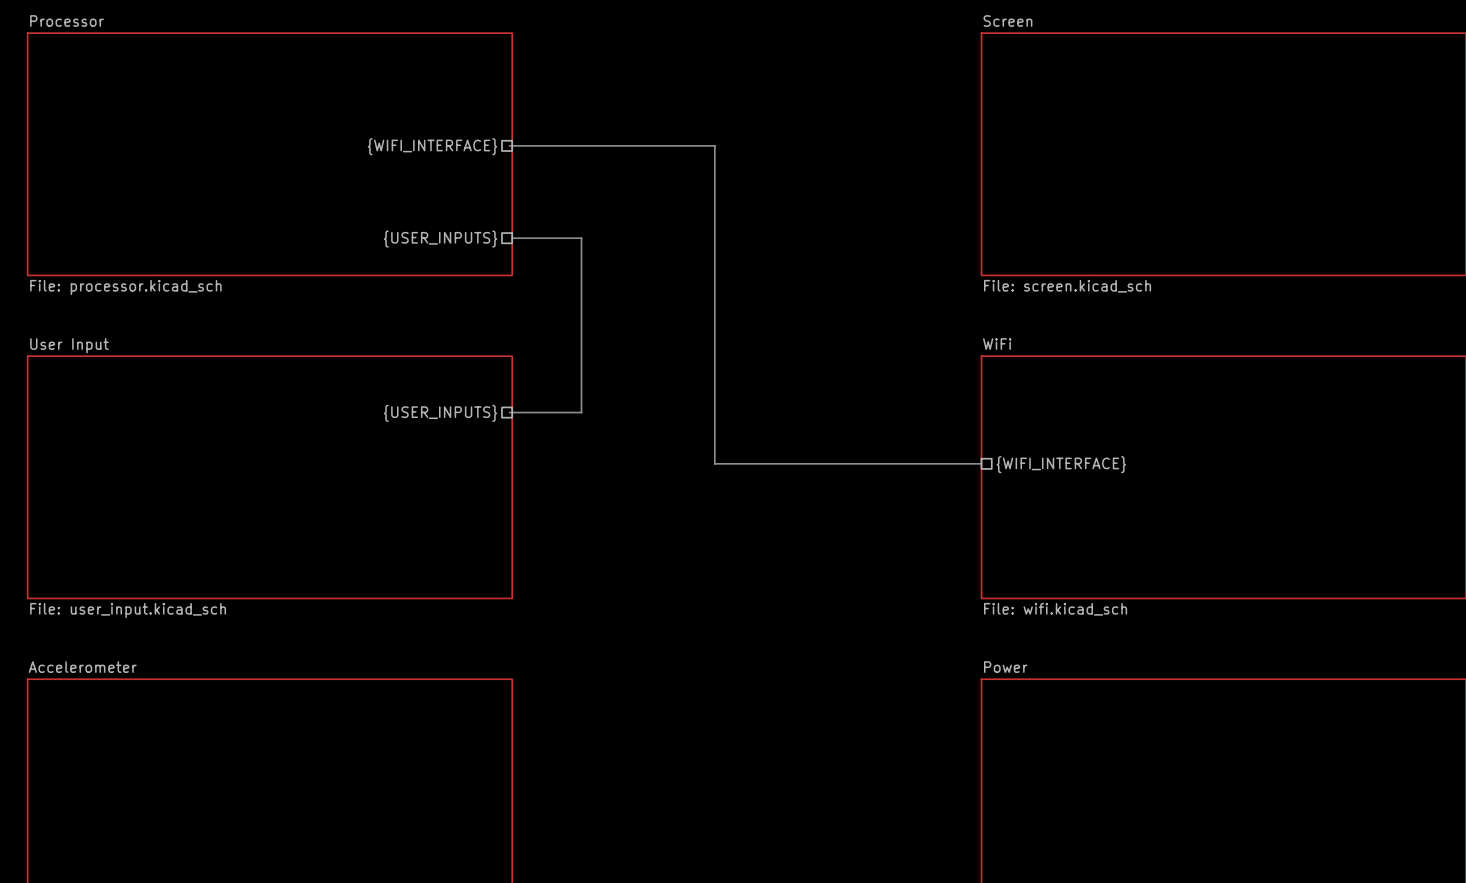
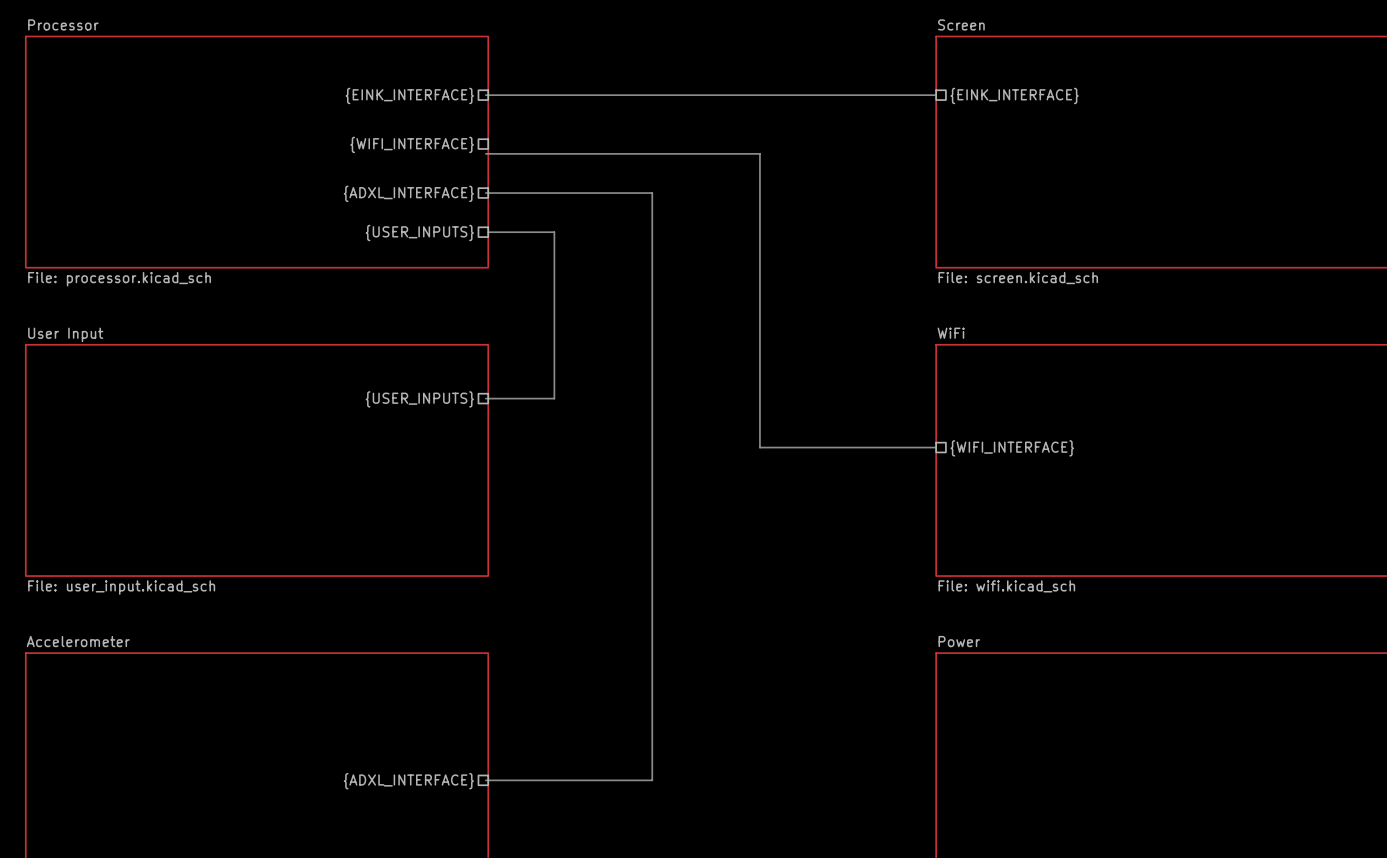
bus: none -> (485, 95) (936, 95)
sheet pin: none -> {EINK_INTERFACE} (409, 95)
sheet pin: none -> {EINK_INTERFACE} (1014, 95)
bus: (509, 145) (714, 145) (714, 463) (796, 463) -> (485, 153) (759, 153) (759, 447)
bus: none -> (485, 193) (652, 193) (652, 780) (485, 780)
sheet pin: none -> {ADXL_INTERFACE} (408, 193)
sheet pin: none -> {ADXL_INTERFACE} (408, 781)

